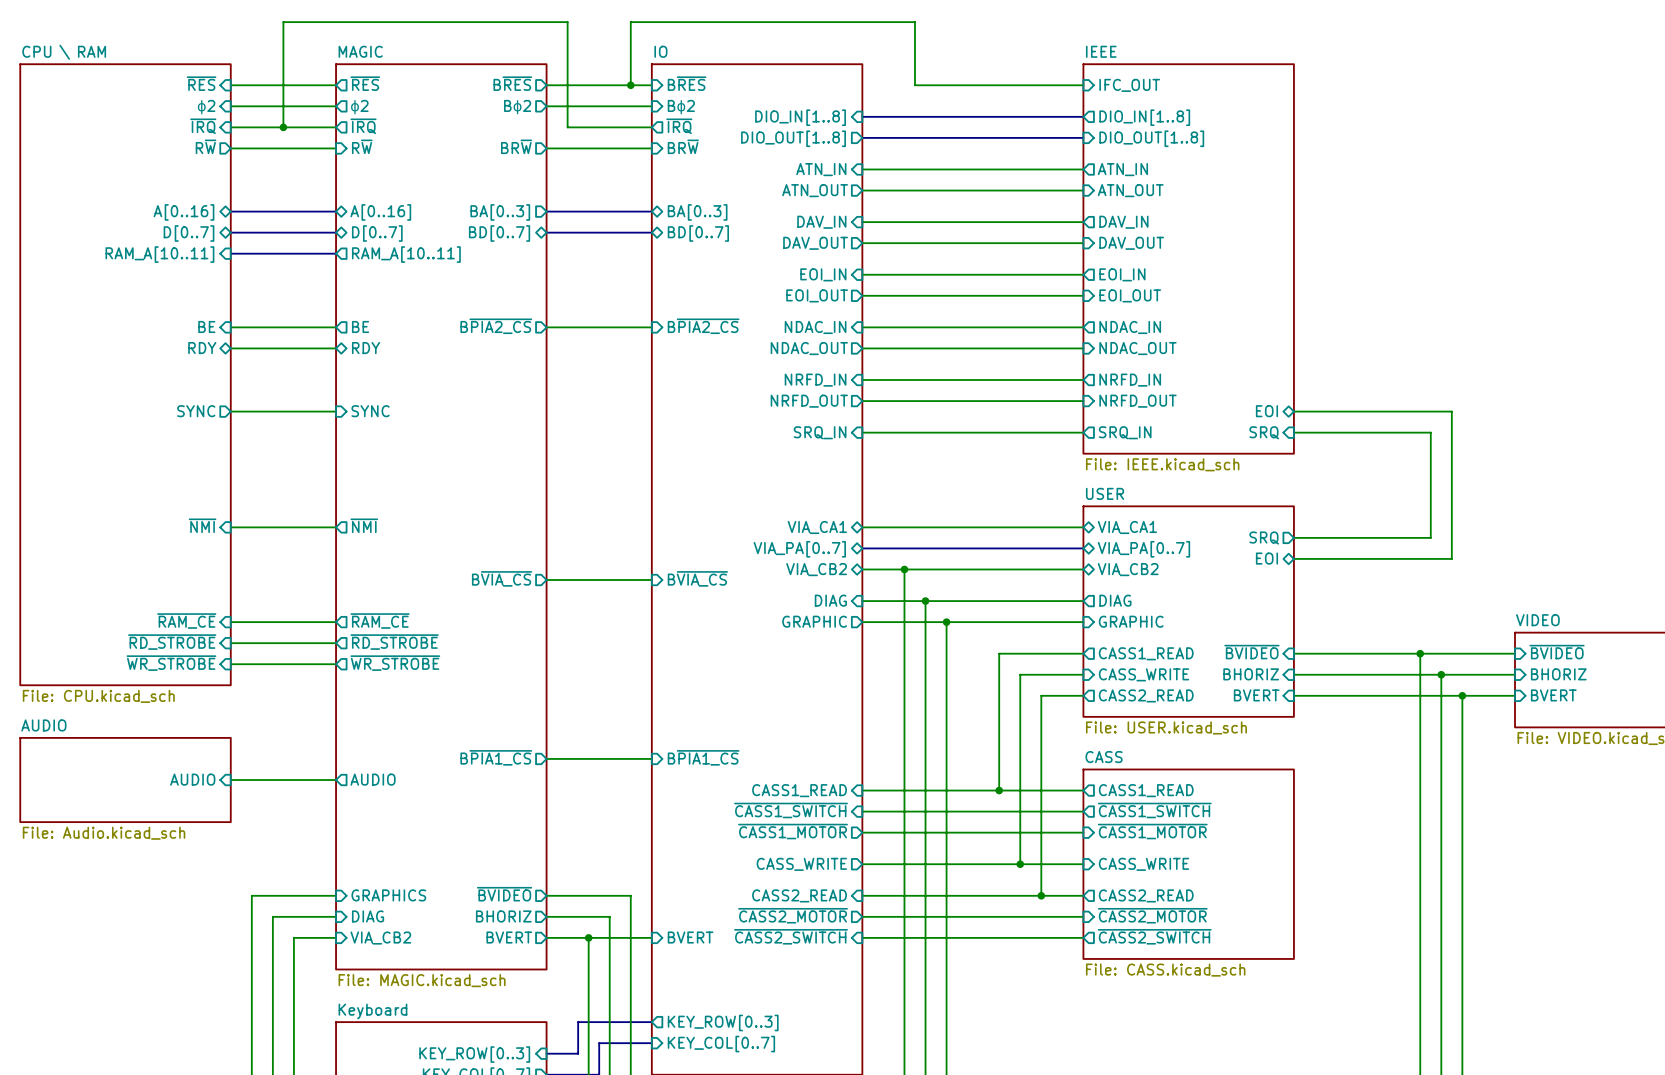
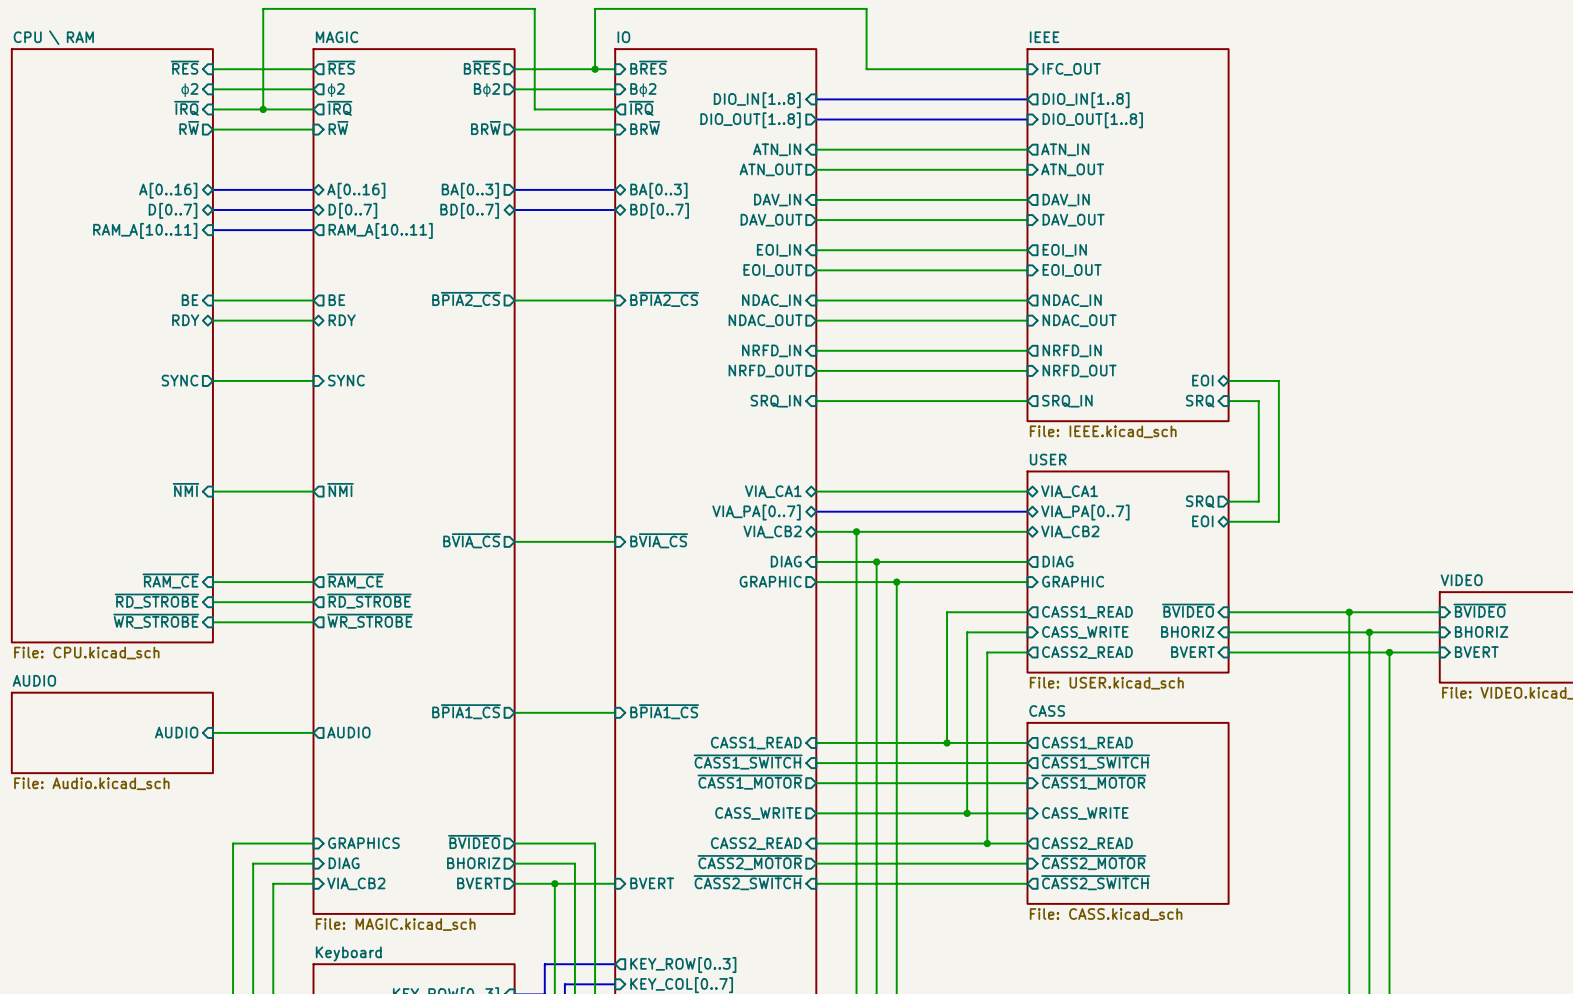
wire: (1346, 411) (1451, 411) (1451, 558) (1346, 558) -> (1278, 380) (1278, 521)
wire: (1325, 432) (1430, 432) (1430, 537) (1325, 537) -> (1258, 401) (1258, 501)

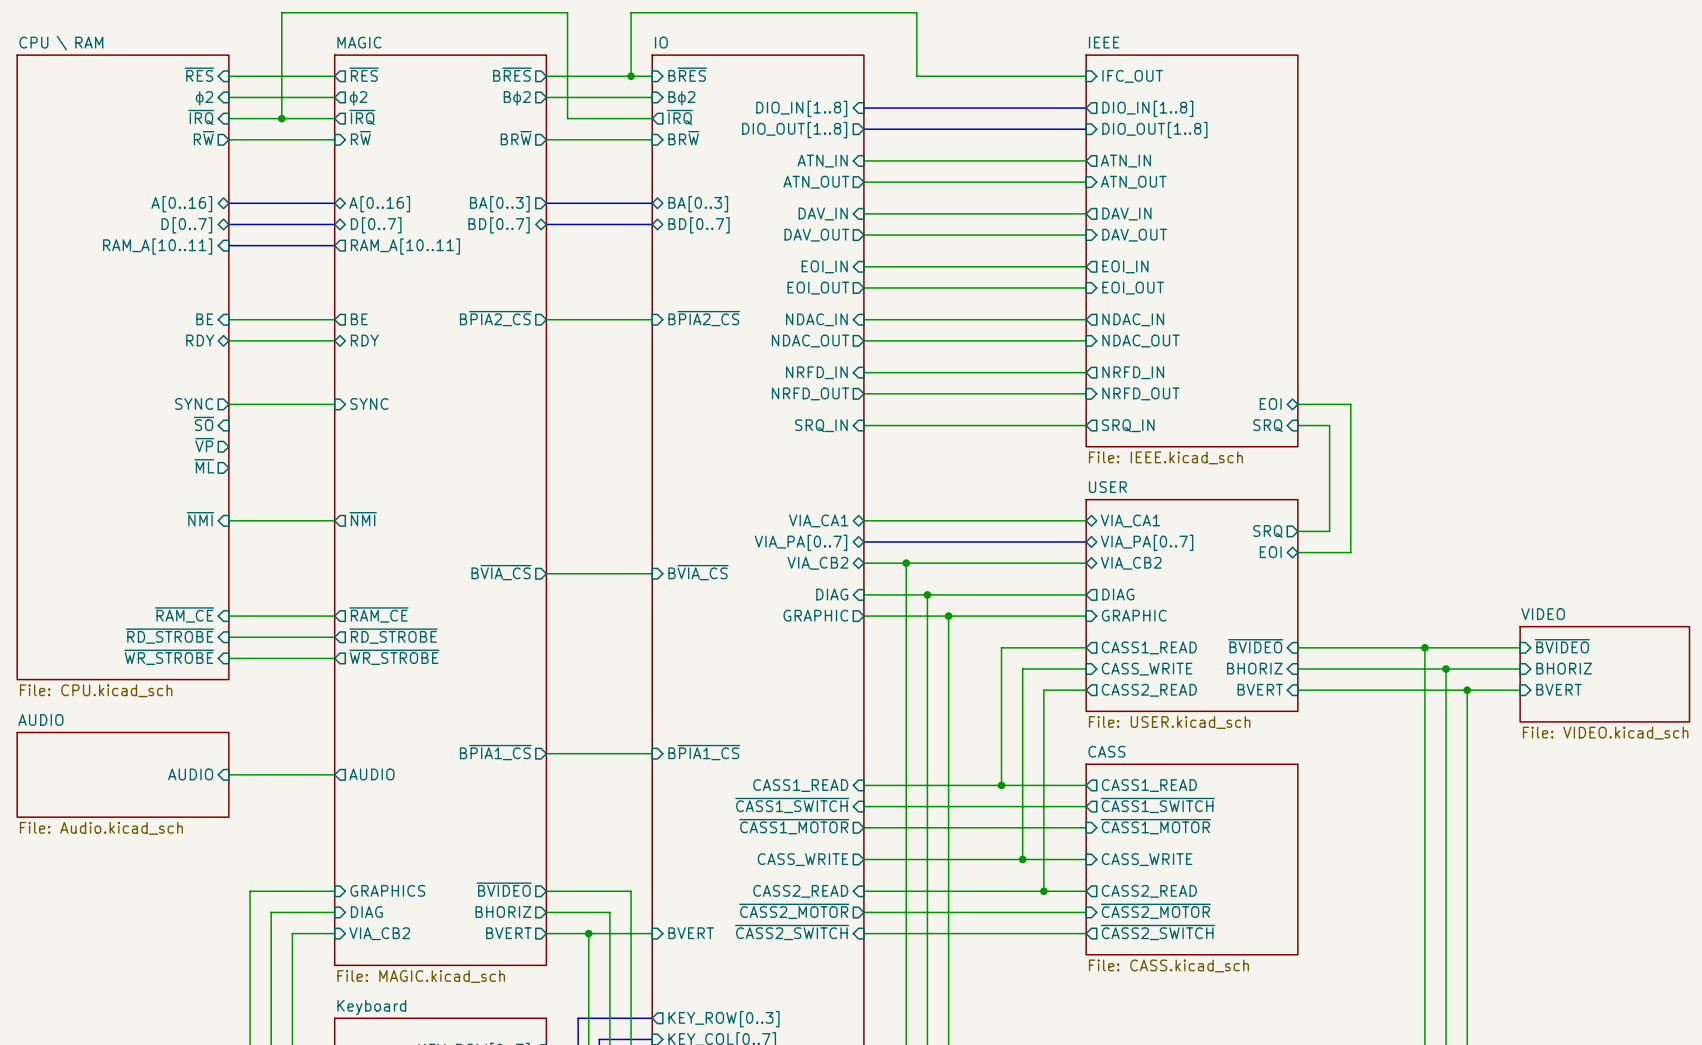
sheet pin: none -> ~{SO} (204, 423)
sheet pin: none -> ~{VP} (204, 445)
sheet pin: none -> ~{ML} (204, 466)

